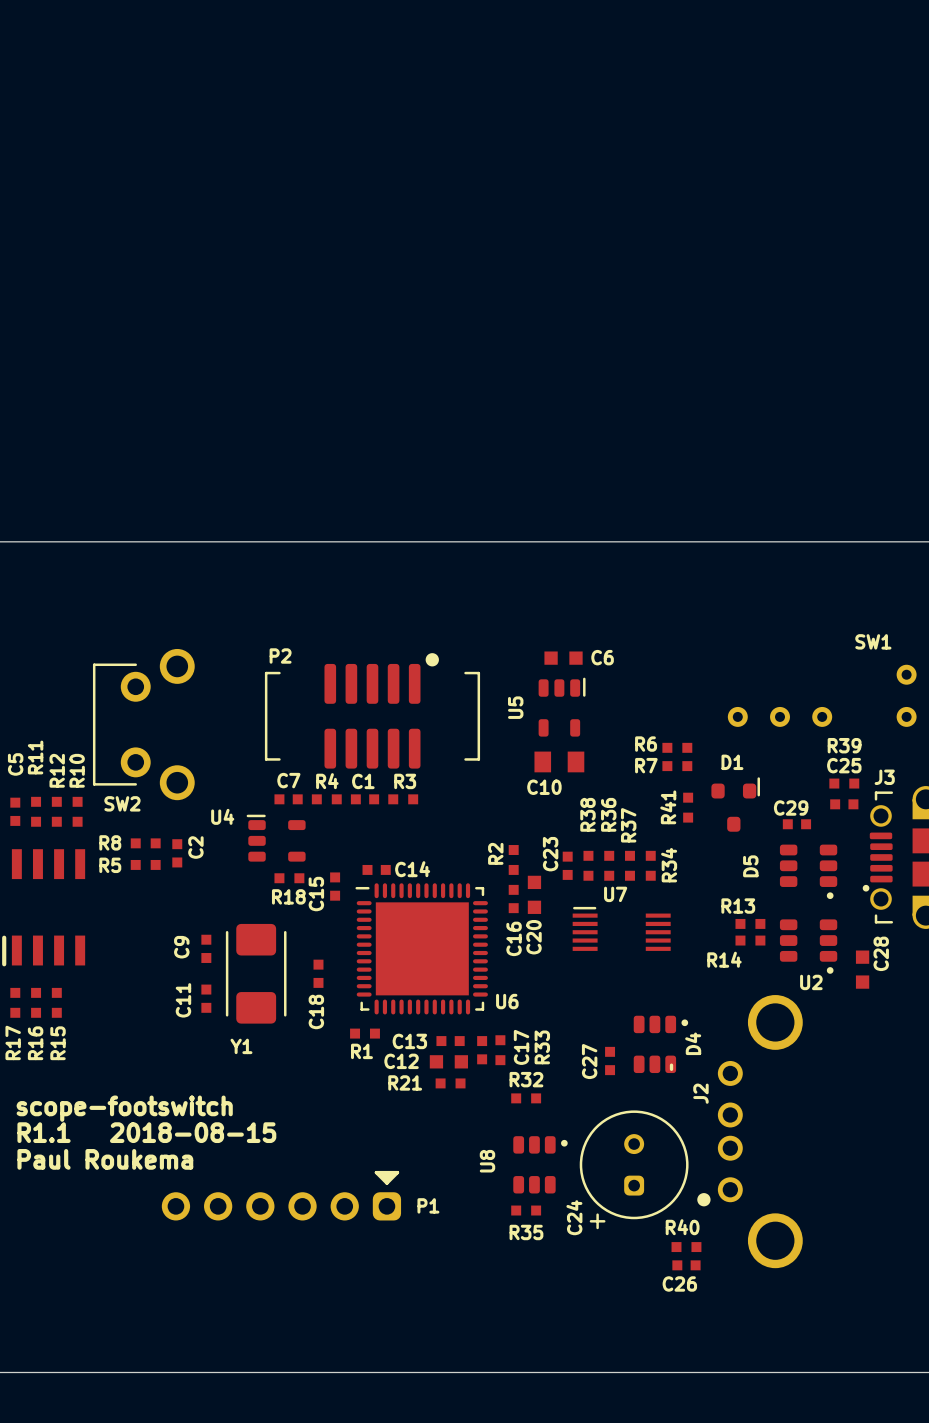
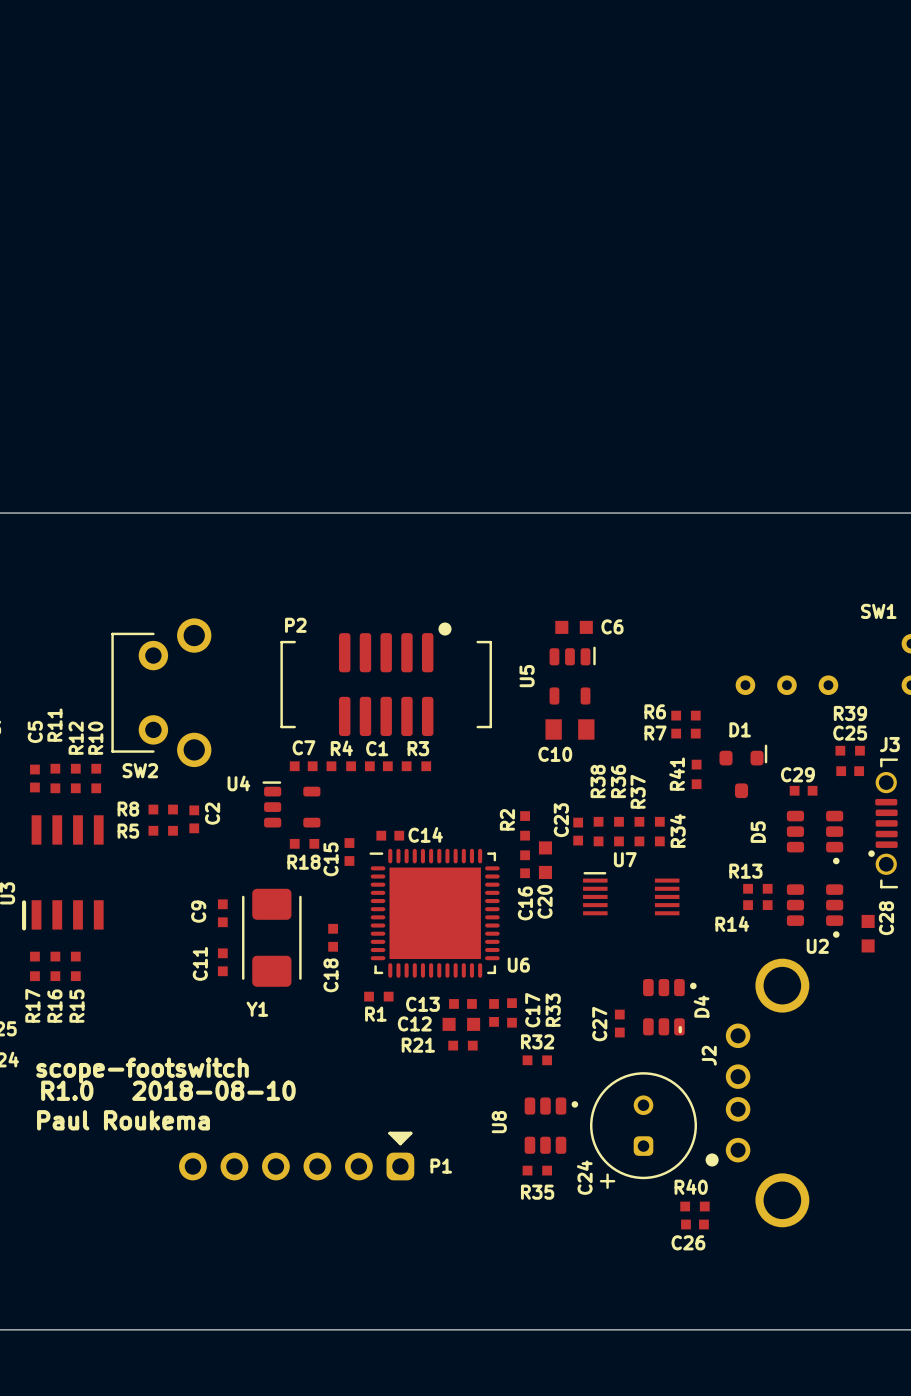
text: R1.1 2018-08-15 (146, 1132) -> R1.0 2018-08-10 (168, 1090)

